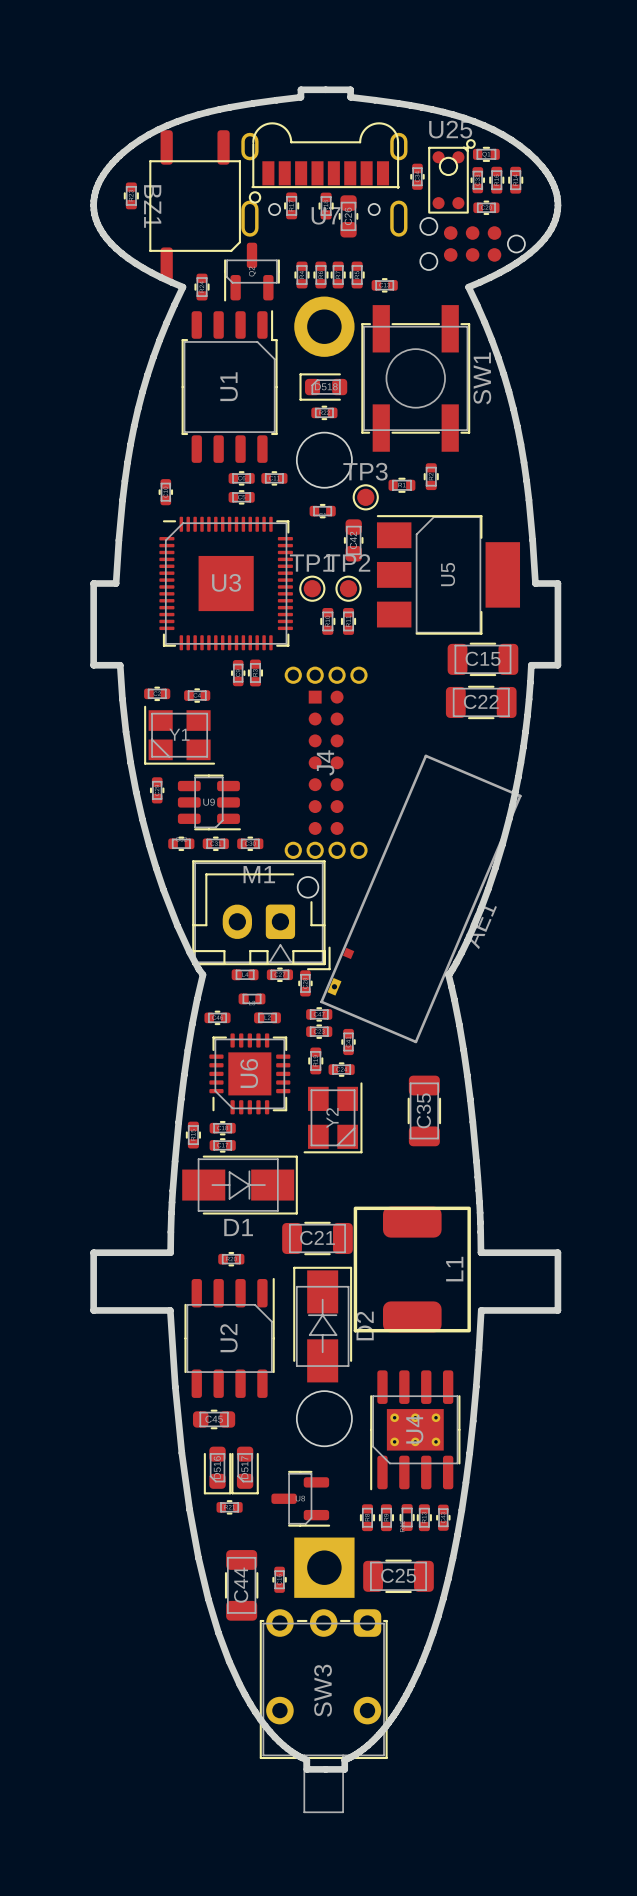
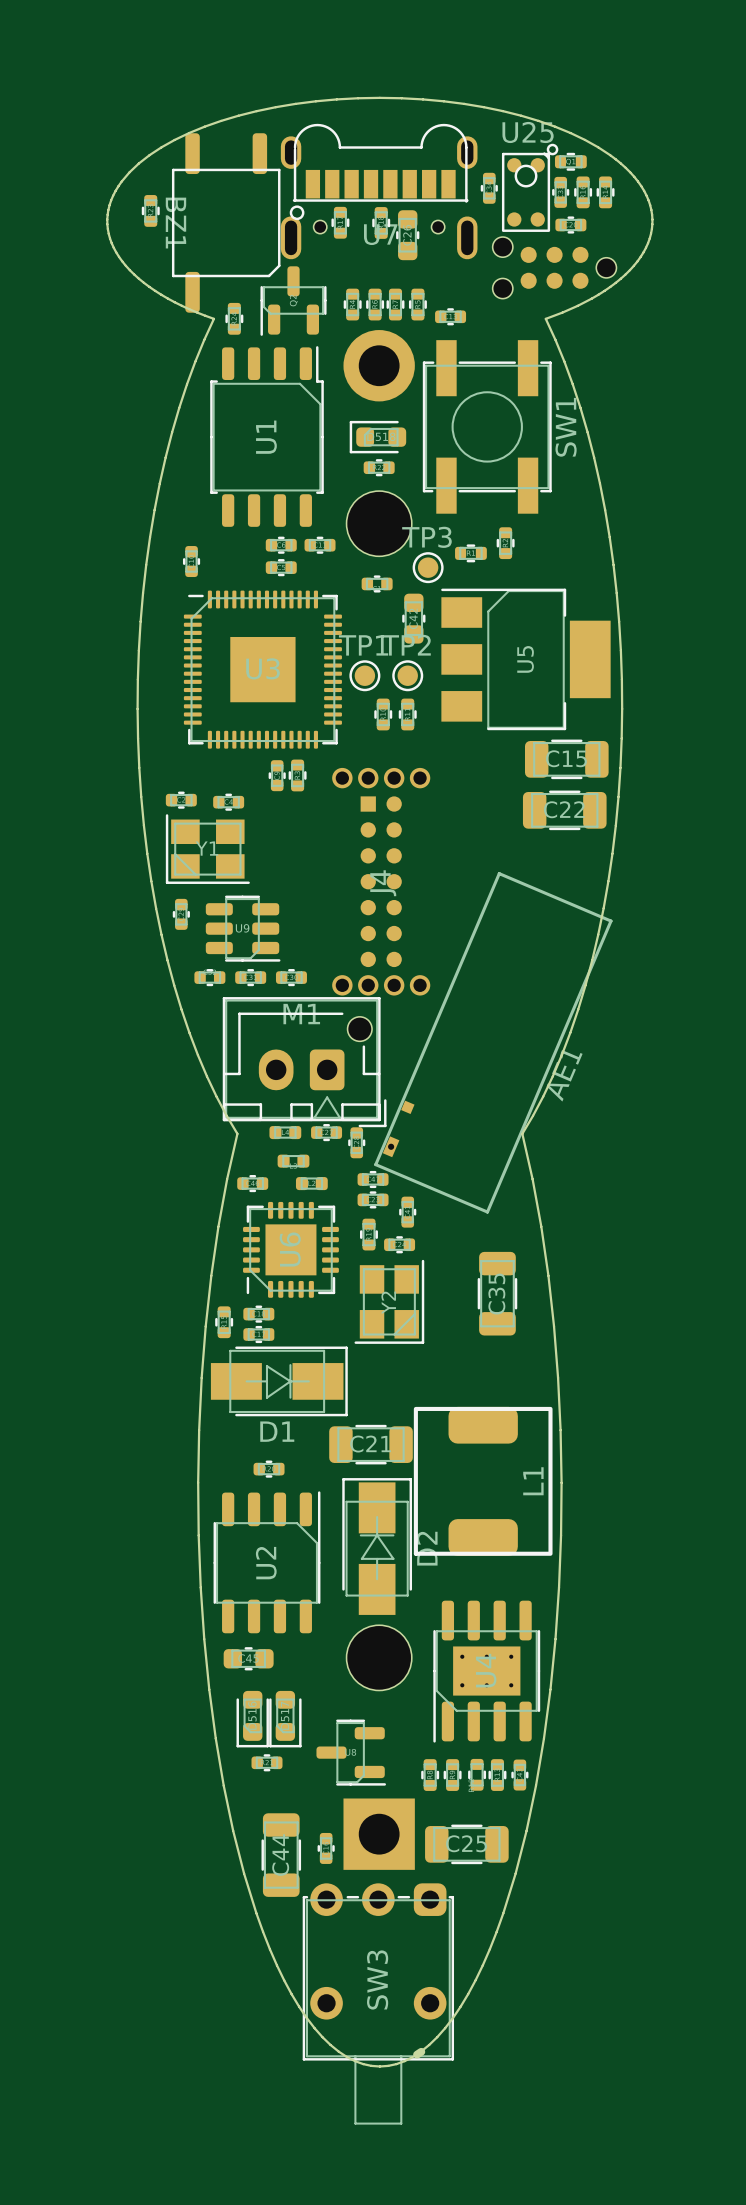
board edge: (360, 1751) (383, 1729) (406, 1694) (427, 1647) (443, 1598) (457, 1535) (465, 1482) (476, 1386) (481, 1310) (557, 1310) (557, 1252) (480, 1252) (478, 1190) (470, 1099) (459, 1024) (448, 974) (474, 925) (502, 844) (520, 762) (527, 715) (531, 665) (557, 665) (557, 583) (535, 583) (528, 500) (517, 426) (498, 357) (468, 287) (508, 268) (535, 248) (551, 229) (555, 219) (557, 205) (552, 183) (535, 159) (511, 139) (484, 125) (432, 109) (350, 97) (350, 89) (300, 89) (300, 97) (219, 109) (187, 118) (158, 129) (131, 145) (115, 159) (100, 178) (94, 196) (95, 219) (103, 233) (111, 243) (143, 268) (182, 287) (153, 357) (134, 426) (122, 500) (116, 583) (93, 583) (93, 665) (120, 665) (130, 762) (149, 844) (177, 925) (202, 974) (192, 1024) (181, 1099) (172, 1190) (170, 1252) (93, 1252) (93, 1310) (170, 1310) (175, 1386) (189, 1509) (208, 1598) (229, 1661) (245, 1694) (260, 1719) (283, 1745) (306, 1760) (306, 1769) (344, 1769) (344, 1760) (356, 1754) -> (421, 2051) (445, 2028) (460, 2006) (482, 1965) (496, 1931) (515, 1873) (526, 1830) (543, 1738) (550, 1689) (559, 1587) (561, 1482) (560, 1430) (554, 1326) (548, 1275) (532, 1179) (522, 1133) (552, 1076) (570, 1032) (585, 985) (598, 934) (608, 881) (618, 796) (621, 679) (619, 621) (609, 537) (594, 457) (580, 407) (564, 361) (545, 318) (591, 298) (625, 274) (637, 261) (646, 247) (651, 233) (652, 219) (646, 195) (630, 172) (610, 155) (570, 133) (521, 115) (464, 103) (401, 98) (358, 98) (315, 101) (256, 111) (204, 126) (174, 139) (138, 163) (121, 181) (111, 200) (107, 224) (110, 238) (116, 252) (138, 278) (174, 302) (213, 318) (187, 384) (172, 432) (159, 483) (150, 537) (143, 593) (137, 708) (143, 825) (151, 881) (161, 934) (181, 1009) (197, 1055) (216, 1096) (237, 1133) (227, 1179) (211, 1275) (205, 1326) (199, 1430) (198, 1482) (200, 1587) (209, 1689) (215, 1738) (233, 1830) (256, 1913) (276, 1965) (299, 2006) (322, 2037) (338, 2051) (355, 2061) (371, 2065) (388, 2065) (412, 2056)

